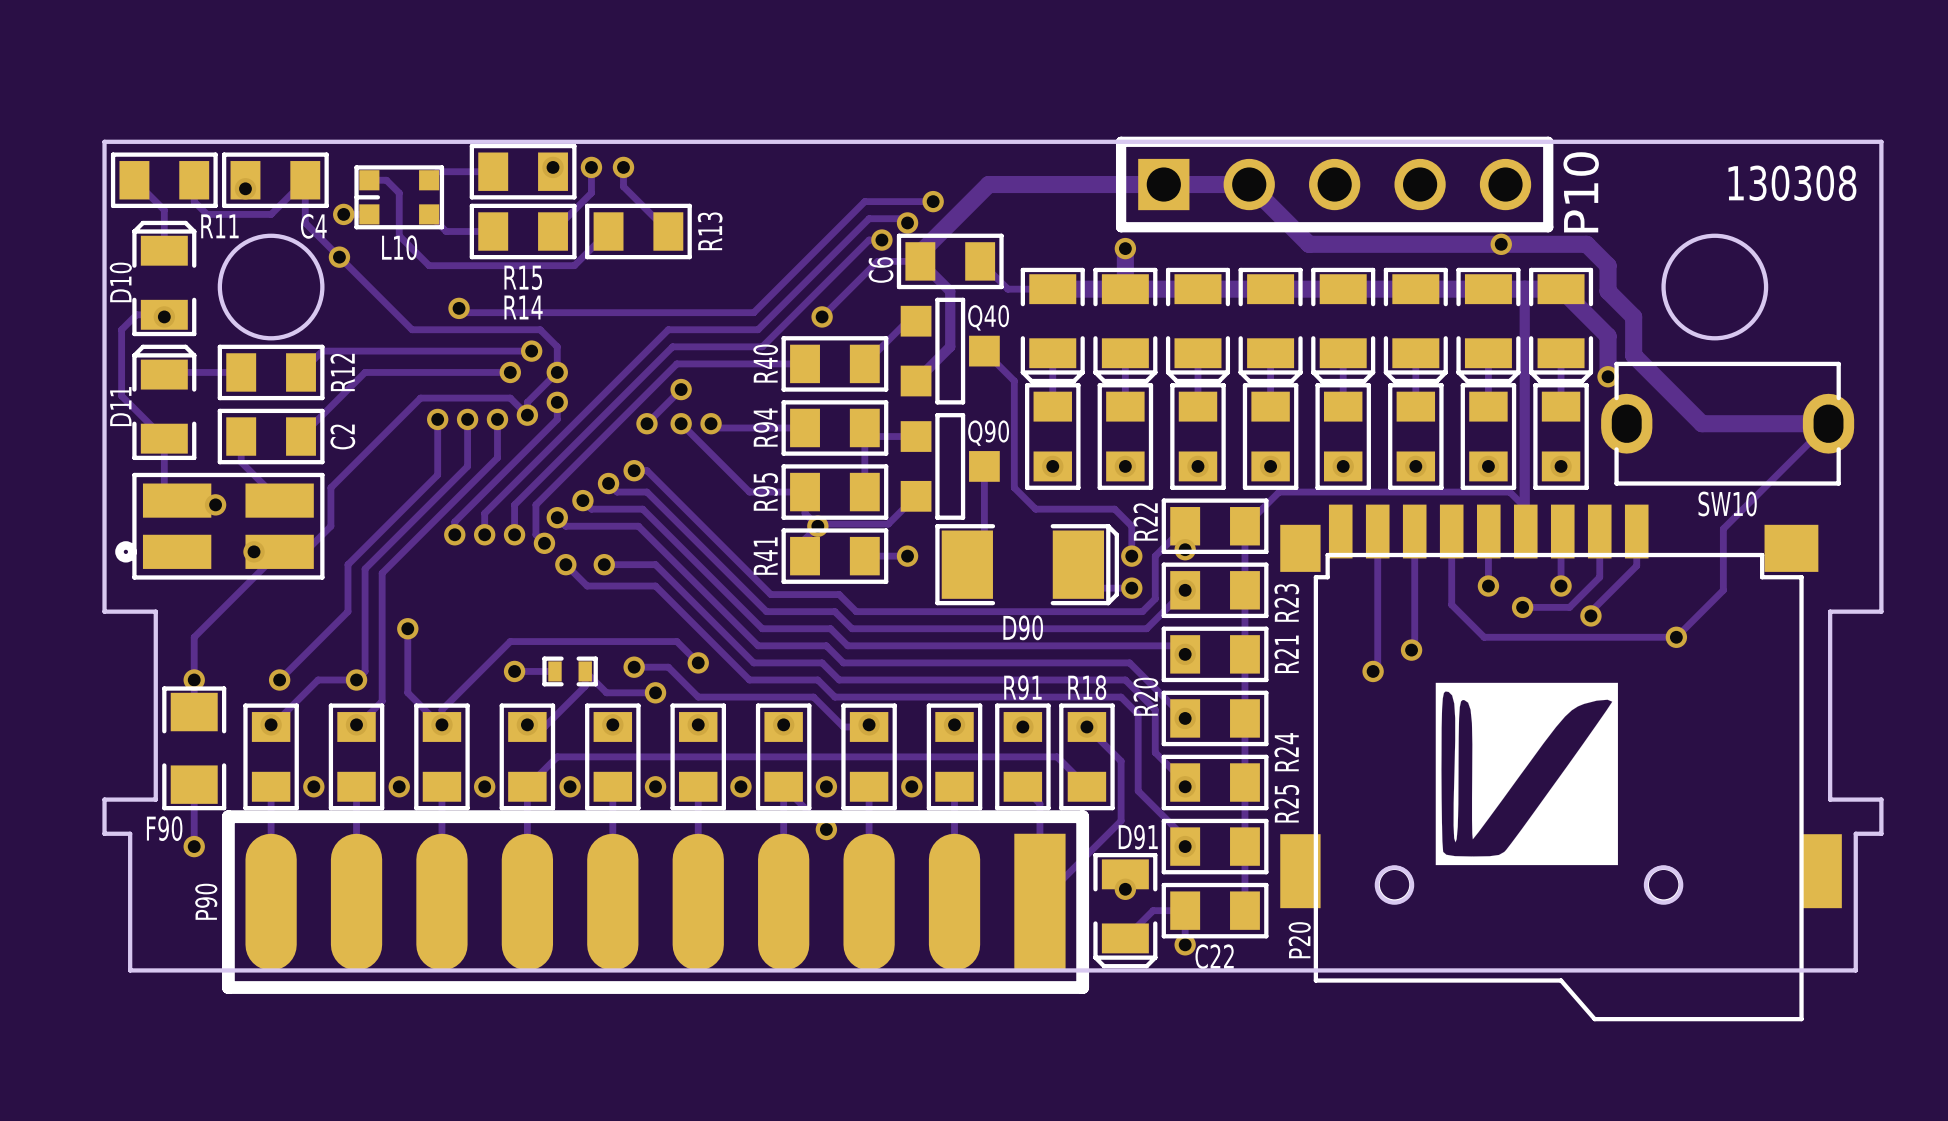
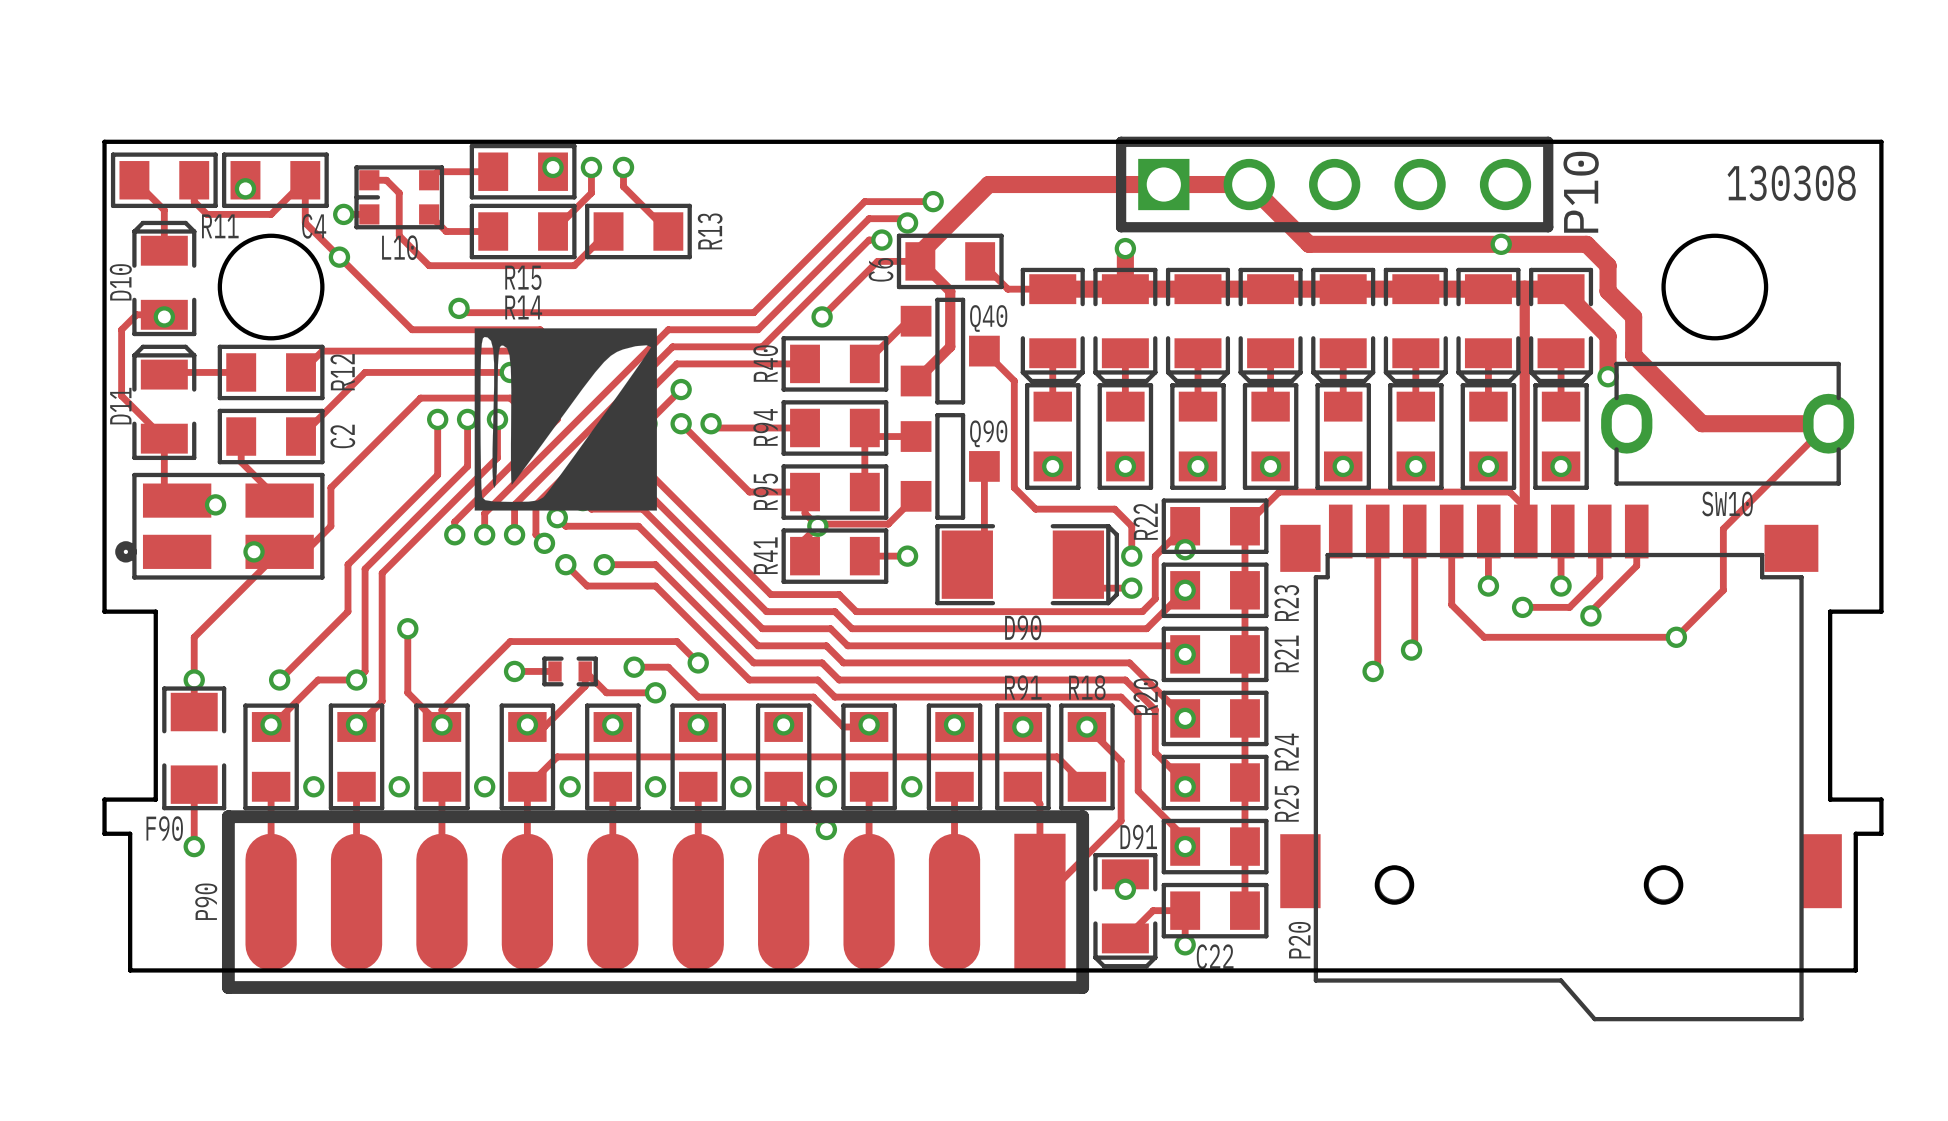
drawing: none -> [474, 328, 657, 511]
drawing: [1435, 682, 1618, 866] -> none

